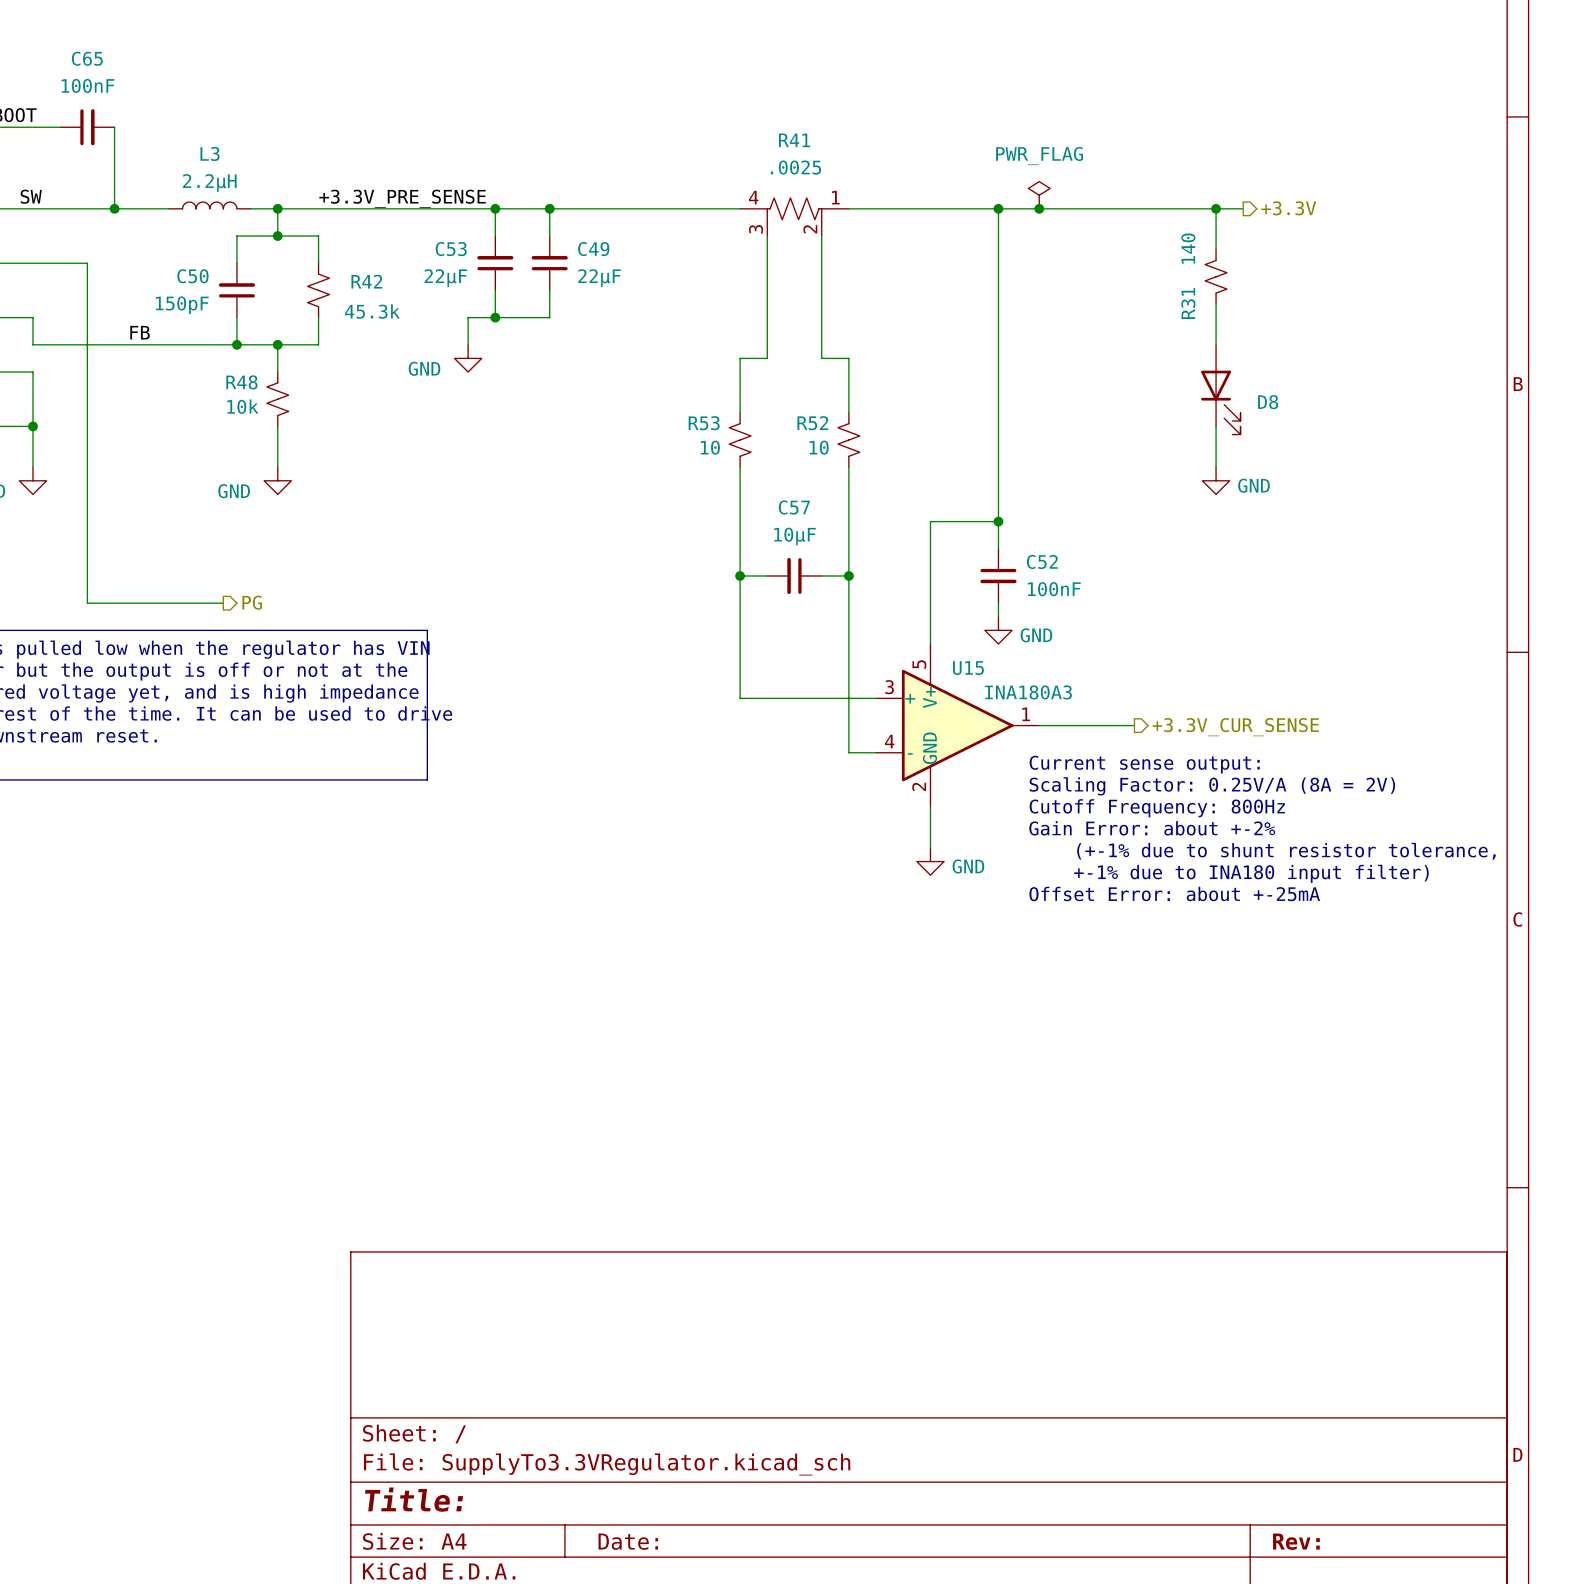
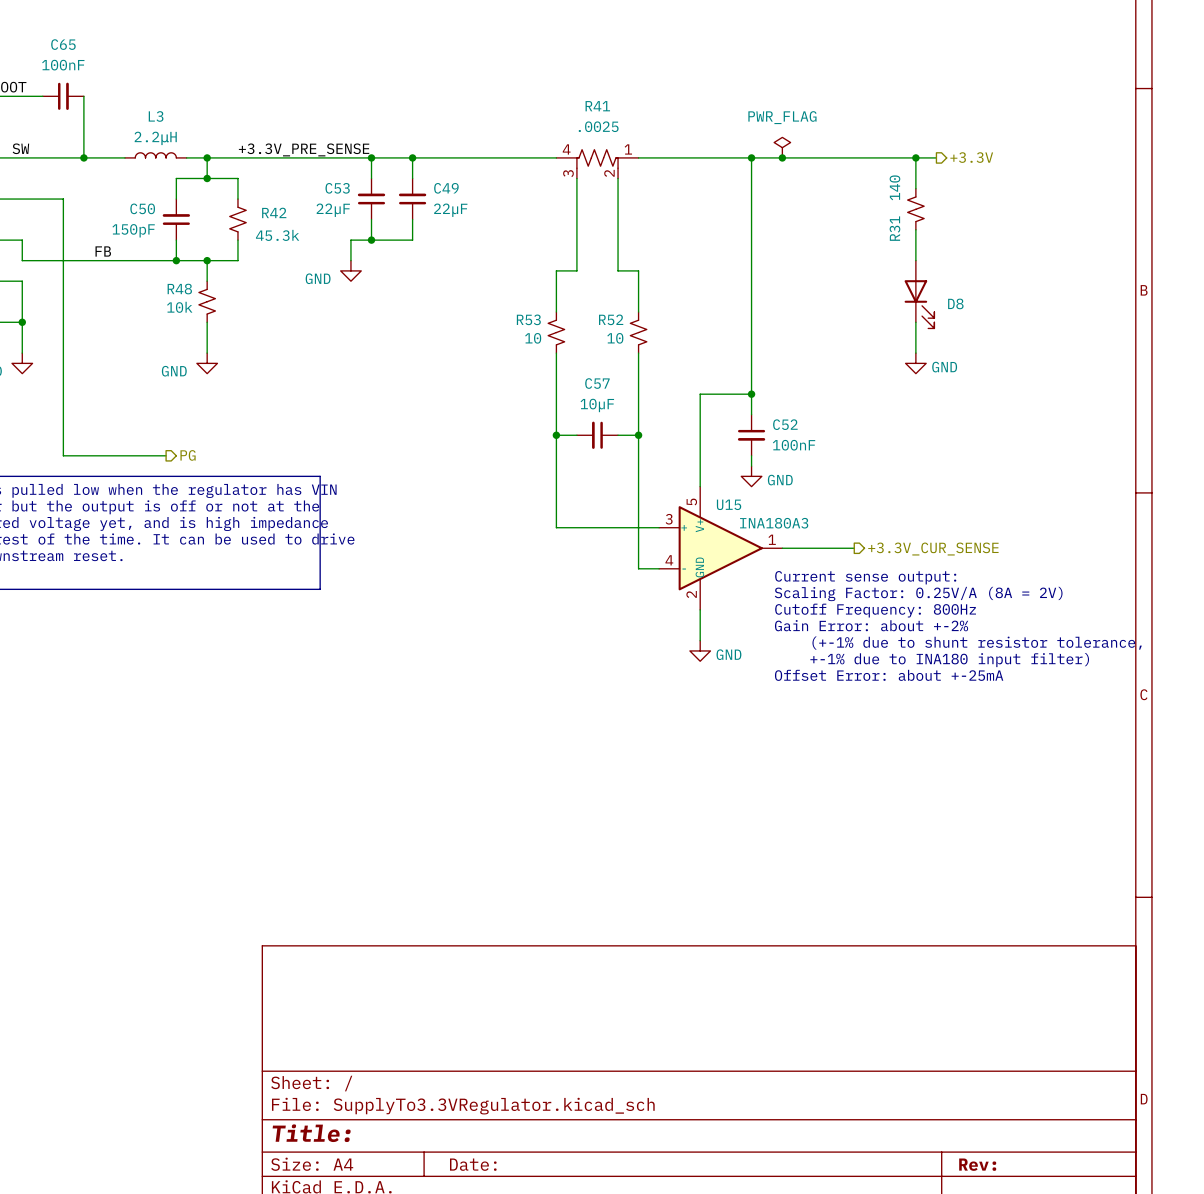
U15 symbol: [876, 643, 1040, 808] -> [659, 486, 783, 610]

